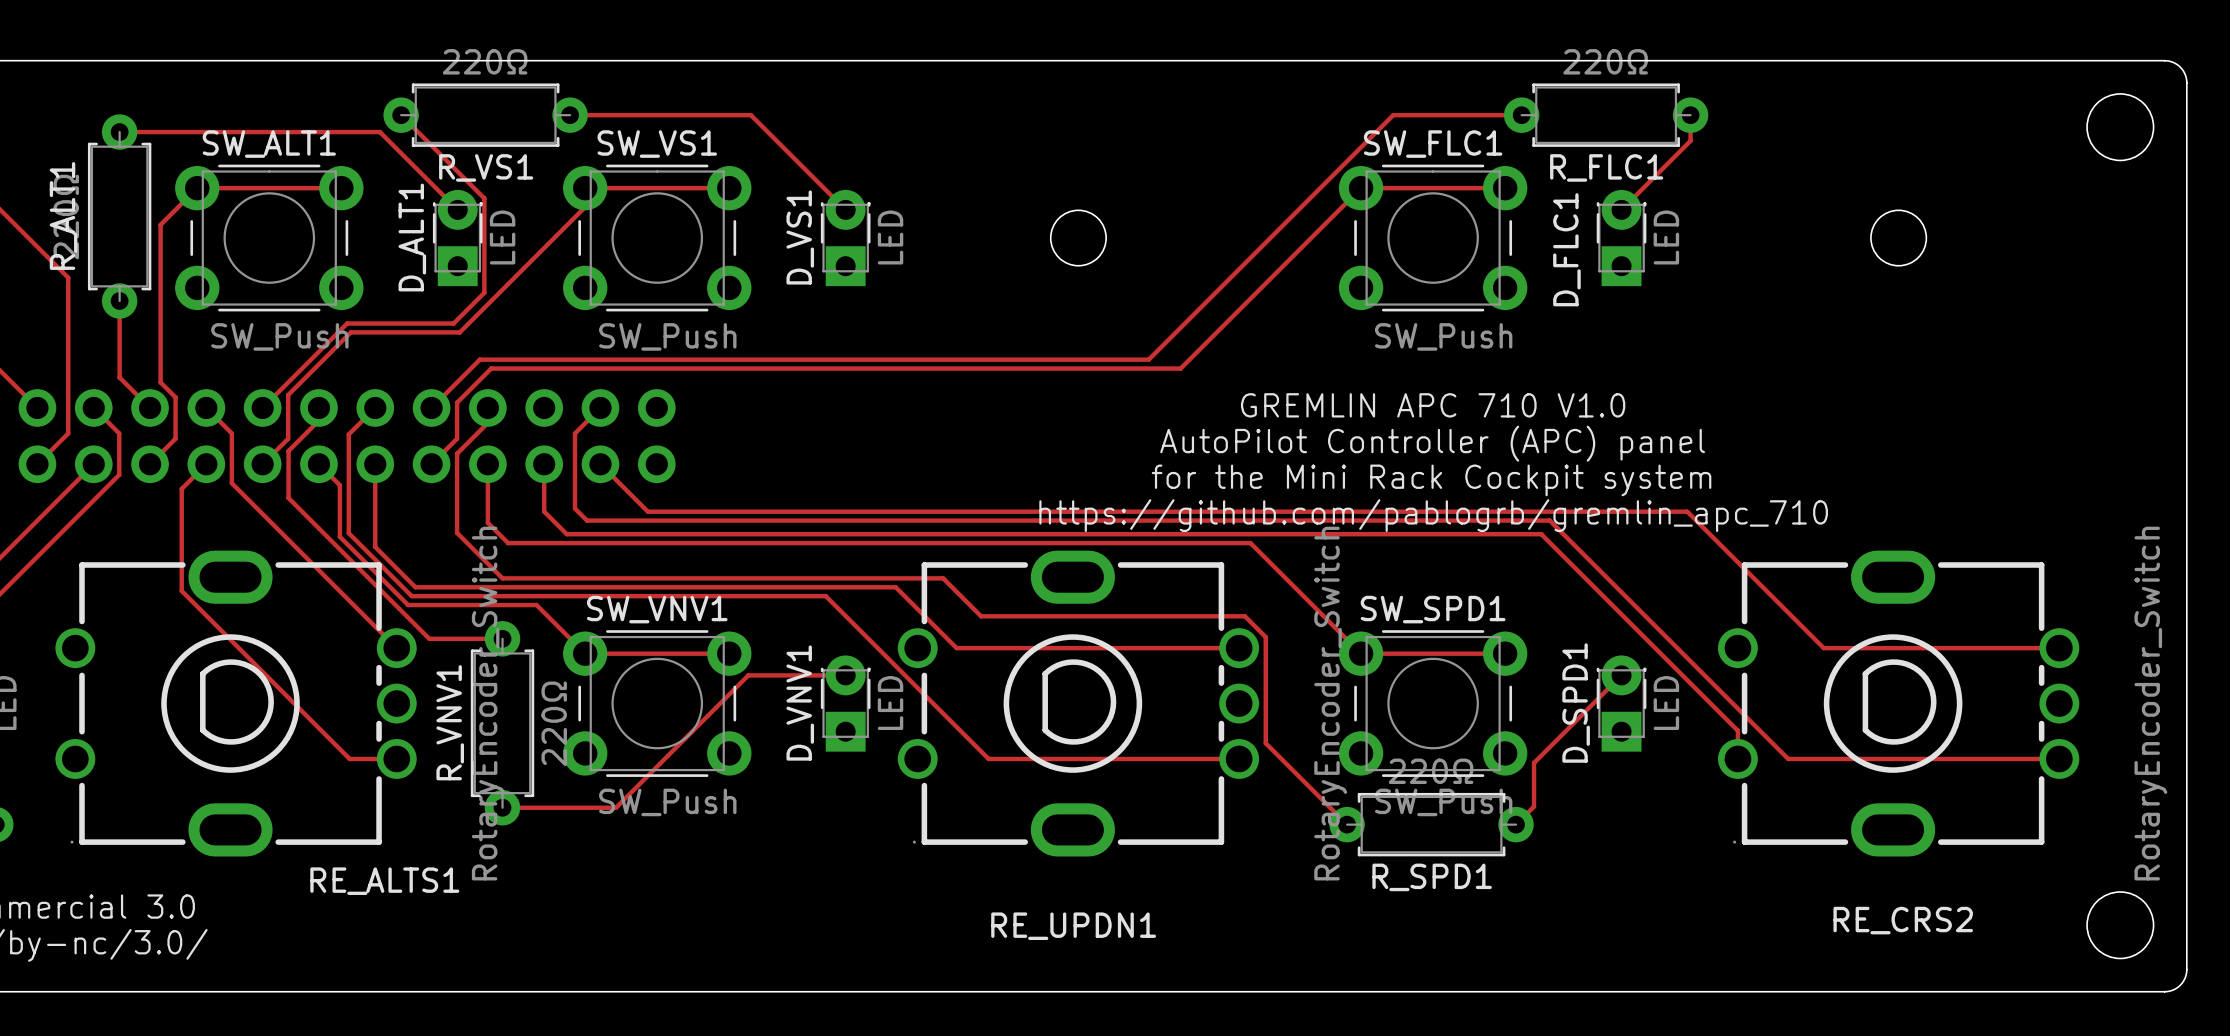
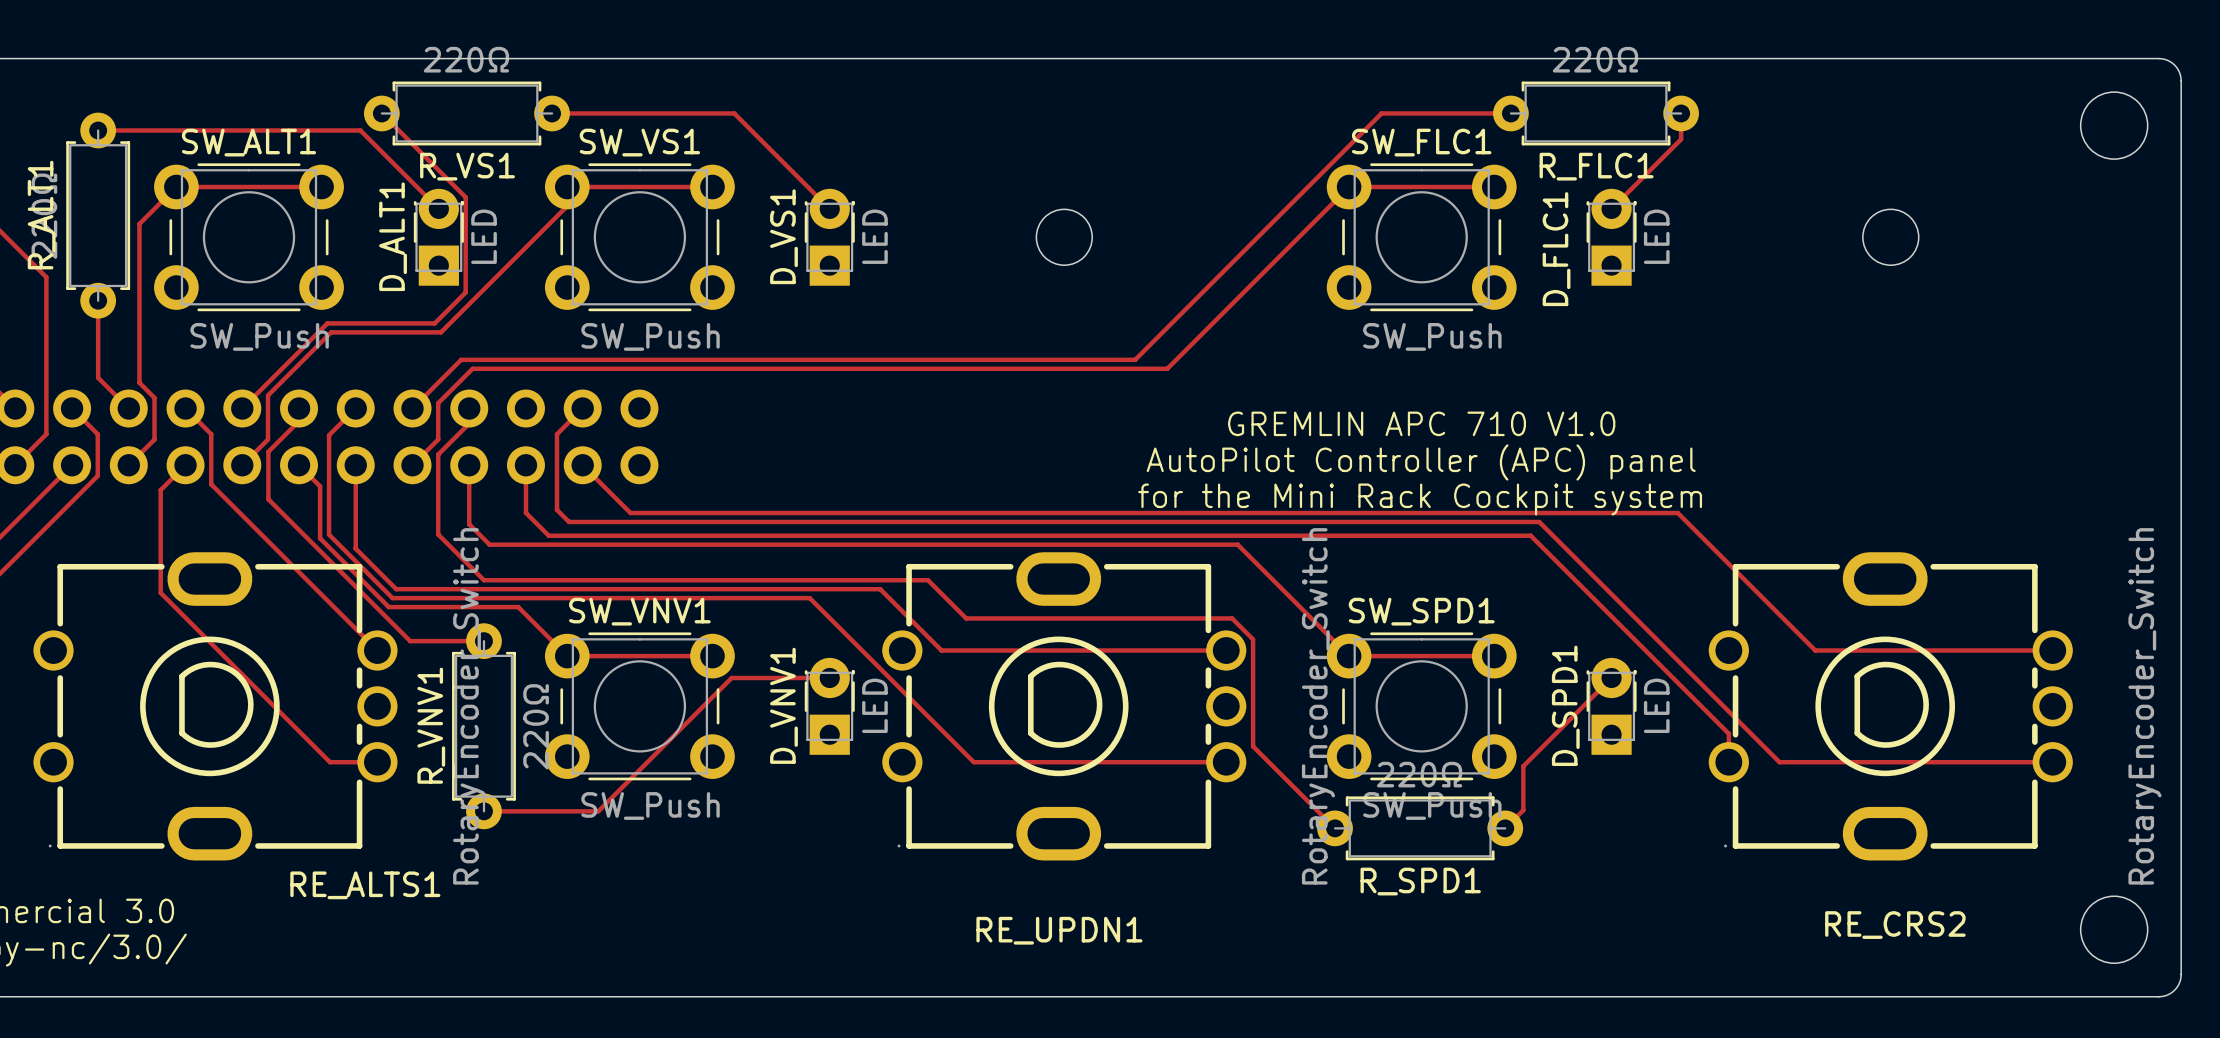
text position: GREMLIN APC 710 V1.0 (1433, 405) -> GREMLIN APC 710 V1.0 (1421, 423)
text position: AutoPilot Controller (APC) panel (1432, 443) -> AutoPilot Controller (APC) panel (1421, 462)
text position: for the Mini Rack Cockpit system (1431, 480) -> for the Mini Rack Cockpit system (1420, 499)
text: https://github.com/pablogrb/gremlin_apc_710 (1433, 515) -> none

